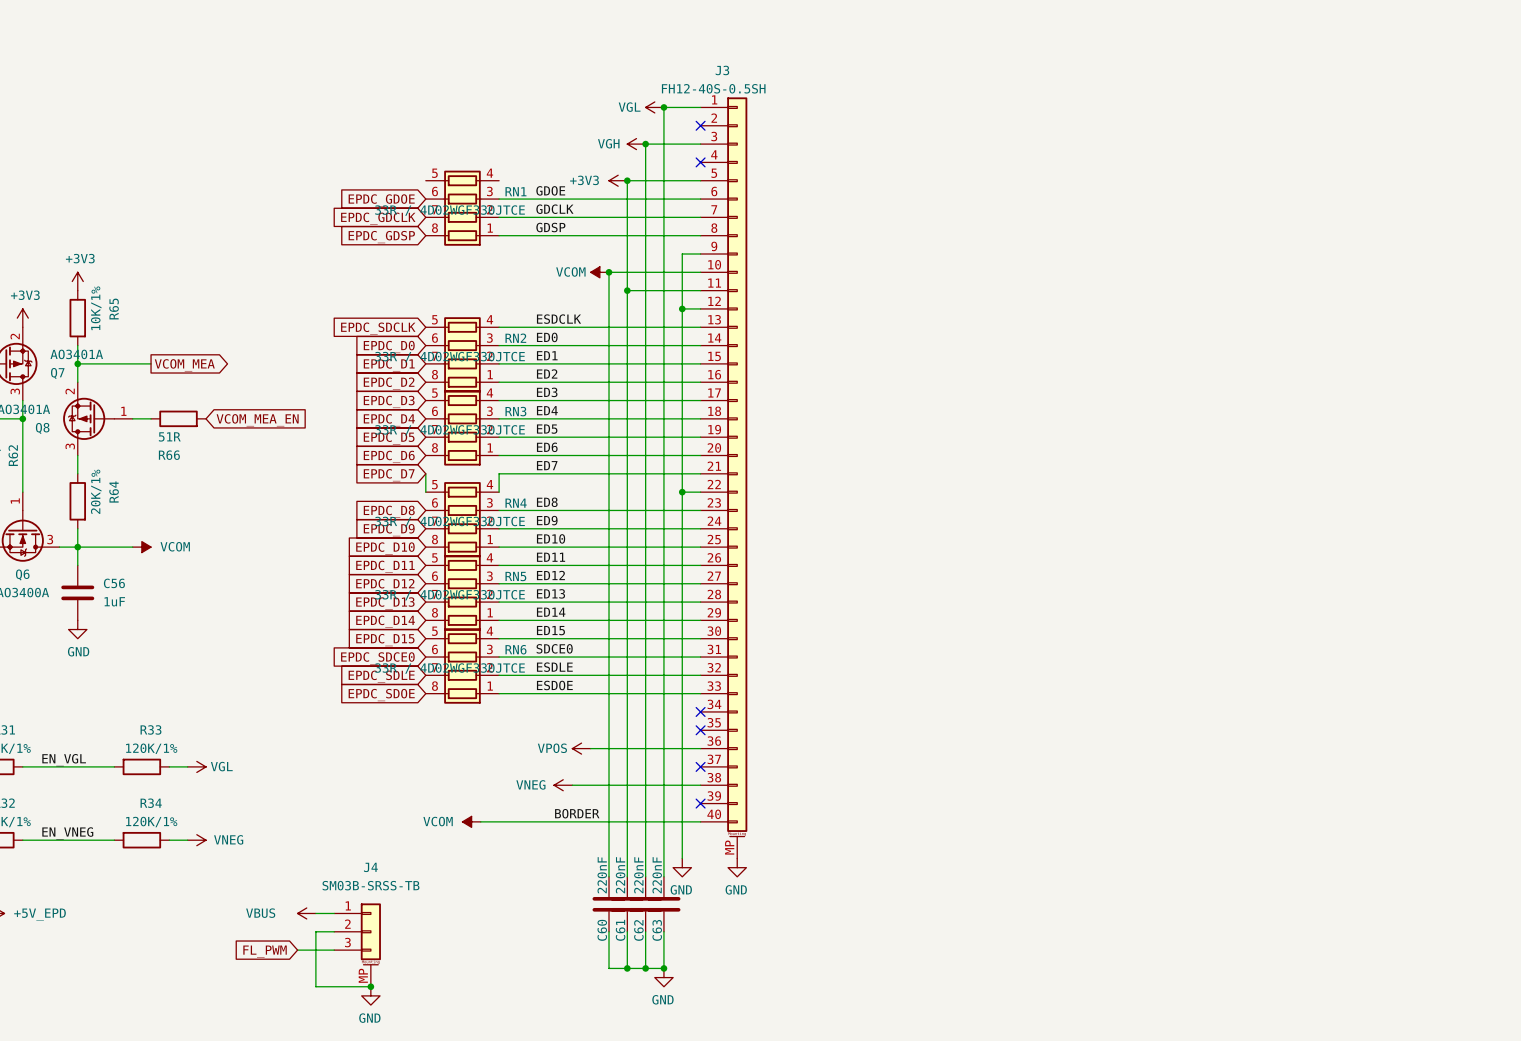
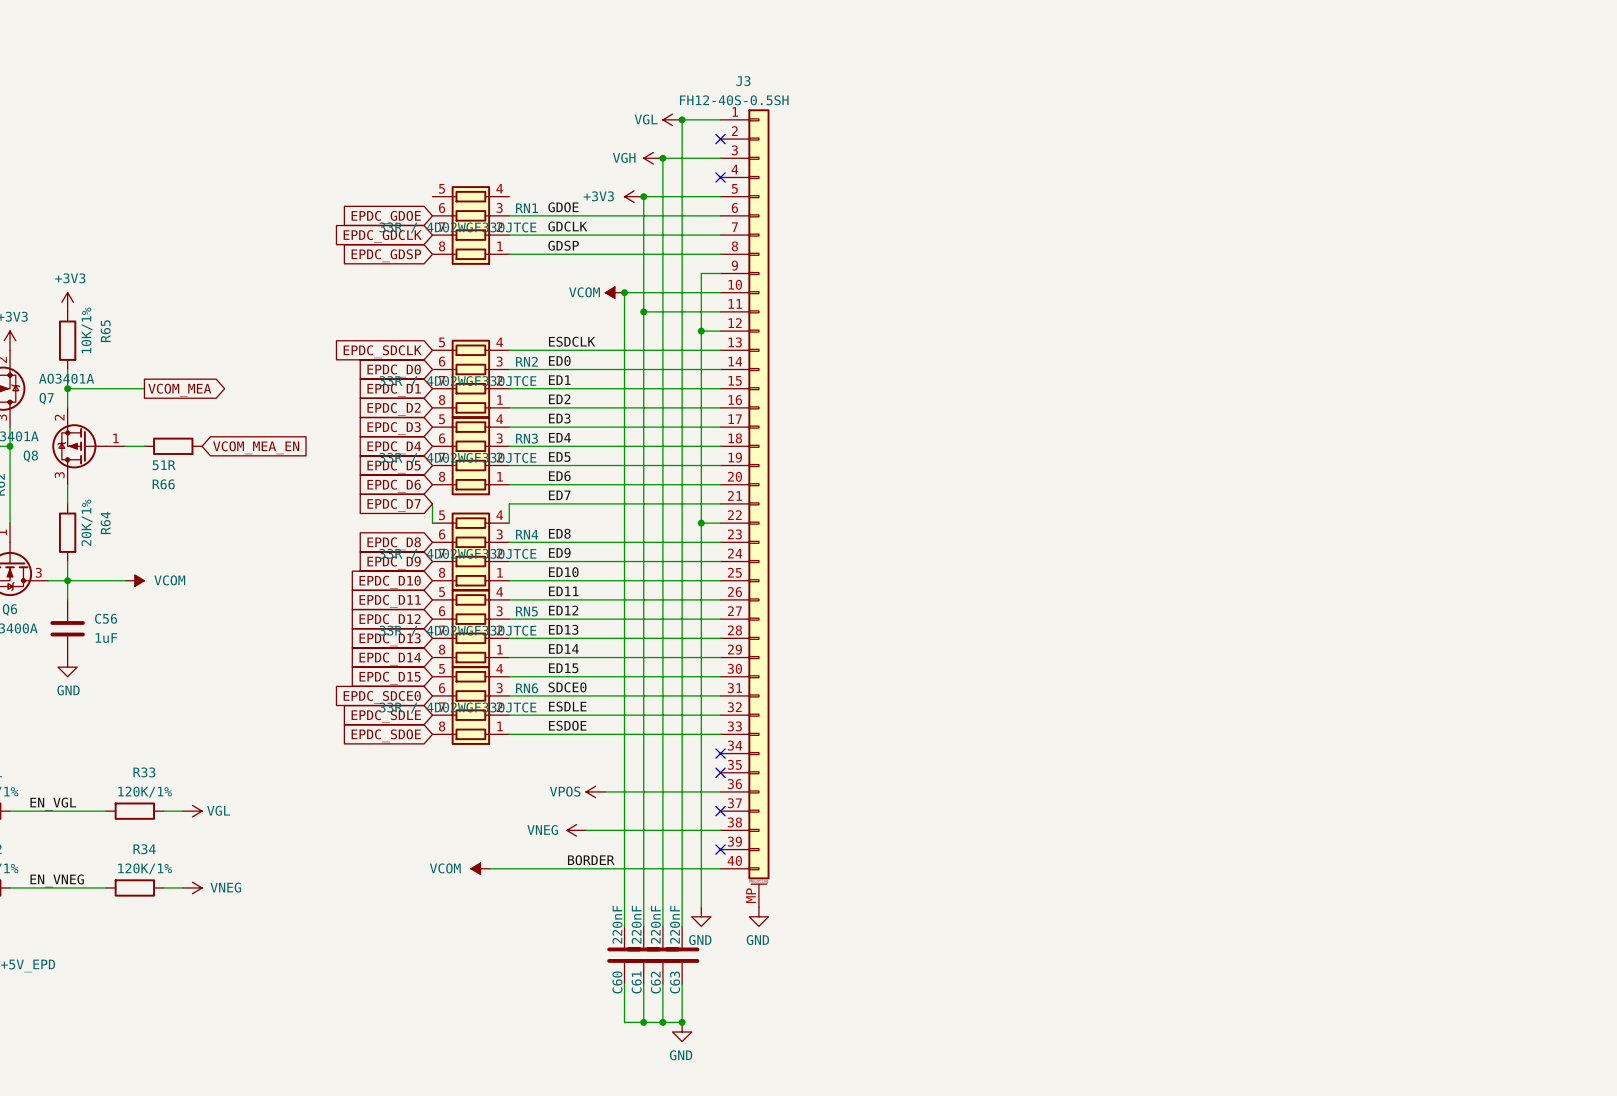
power symbol: VBUS (306, 913) -> none
wire: (315, 913) (334, 913) -> none
wire: (334, 931) (315, 931) (315, 986) (370, 986) -> none
J4: SM03B-SRSS-TB (357, 945) -> none
wire: (297, 950) (334, 950) -> none
global label: FL_PWM (265, 951) -> none
junction: (370, 986) -> none
power symbol: GND (370, 995) -> none

